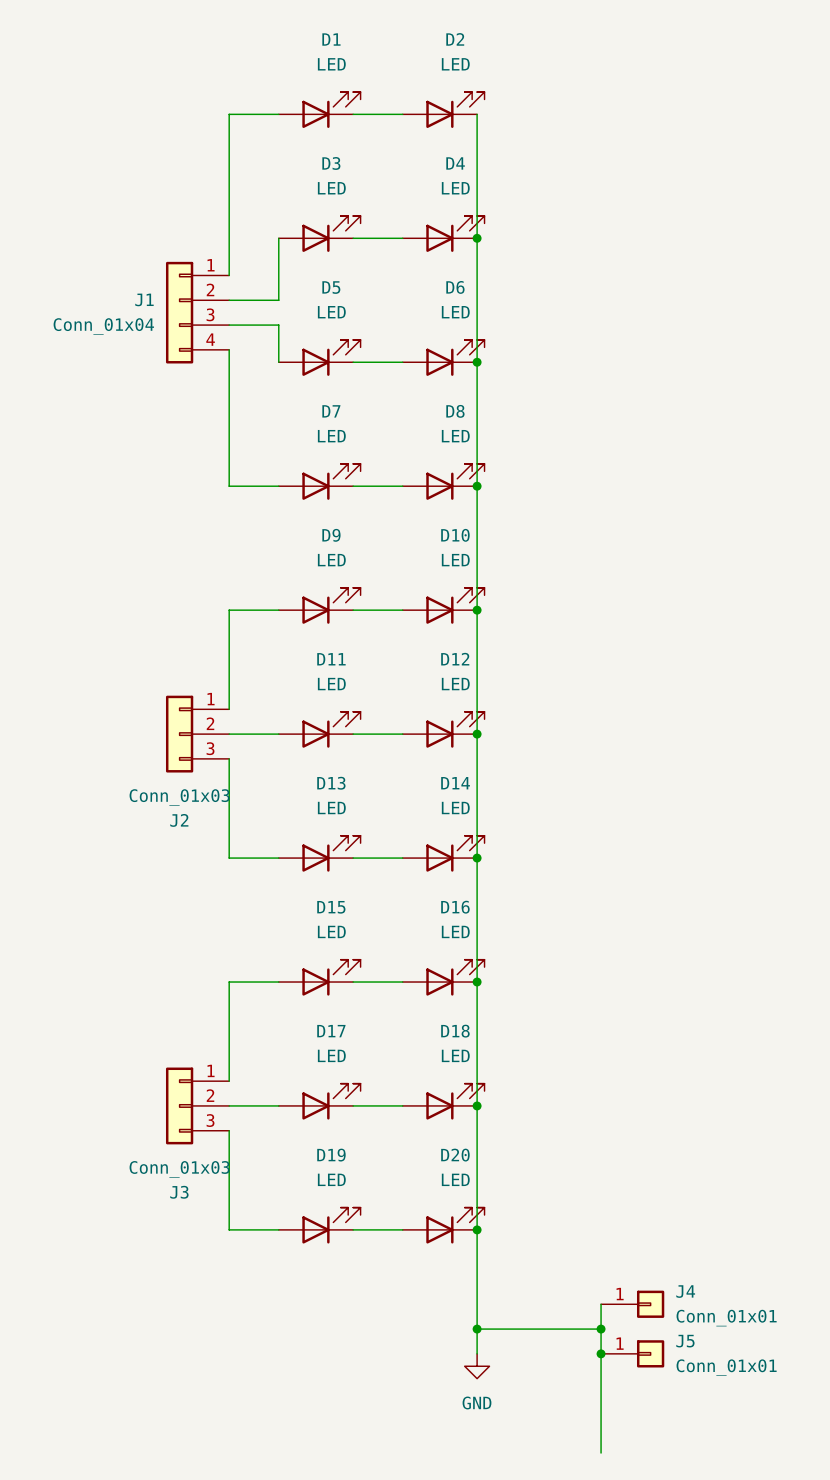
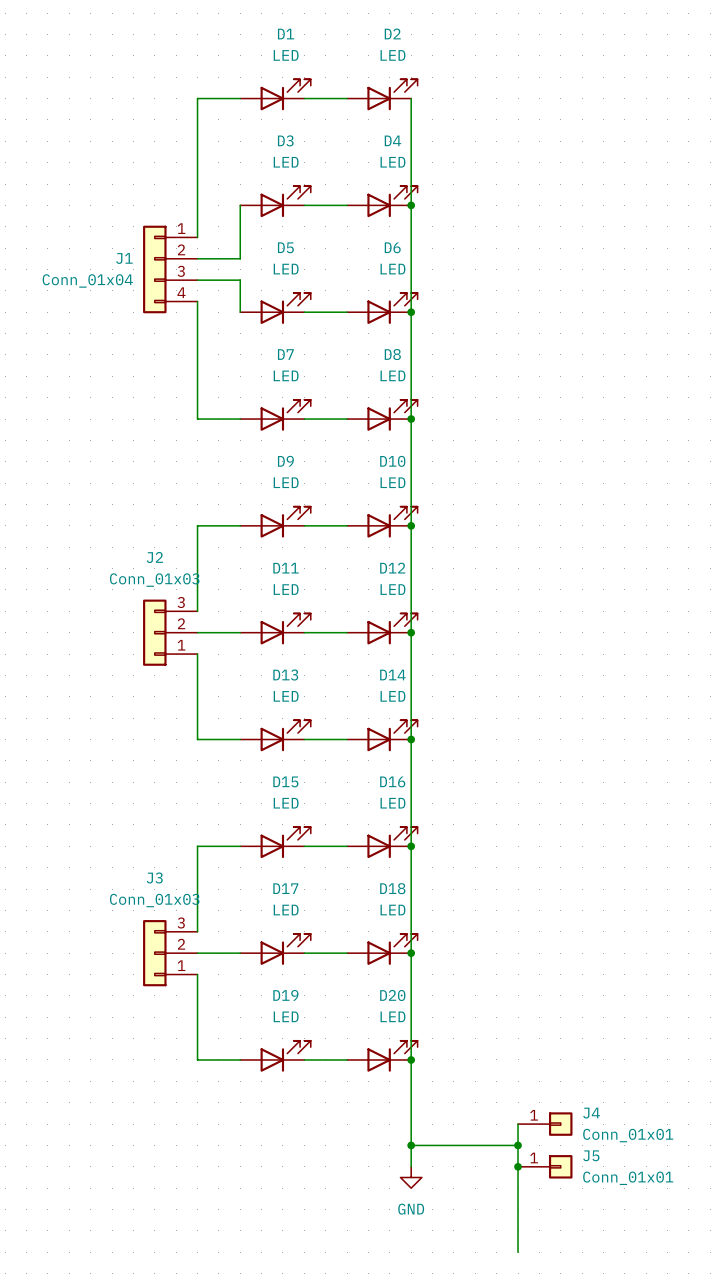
J2 flip: as is (179, 734) -> up-down (154, 632)
J3 flip: as is (179, 1105) -> up-down (154, 953)

